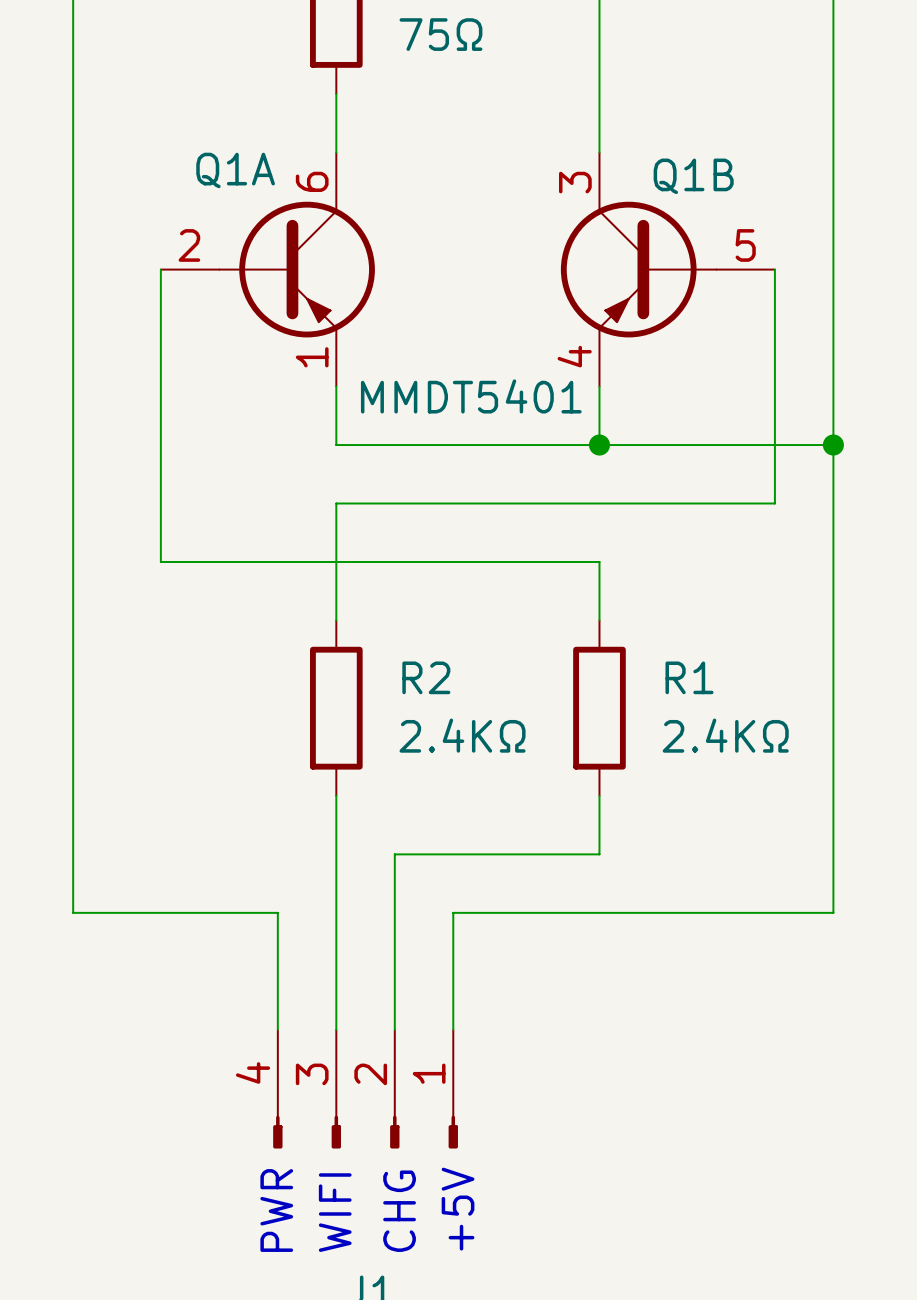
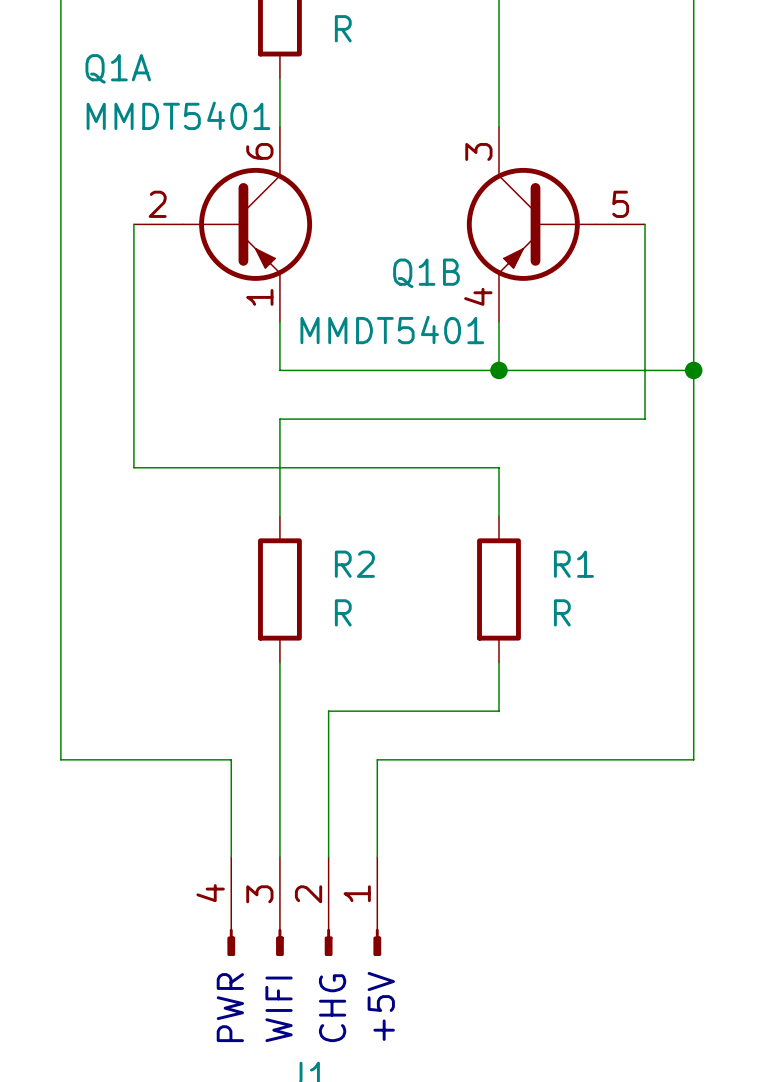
part value: 75Ω (440, 34) -> R (343, 28)
Q1A value: none -> MMDT5401 (178, 115)
Q1A name position: Q1A (235, 170) -> Q1A (118, 68)
Q1B name position: Q1B (693, 176) -> Q1B (426, 273)
R2 value: 2.4KΩ (462, 735) -> R (343, 612)
R1 value: 2.4KΩ (725, 735) -> R (562, 612)

